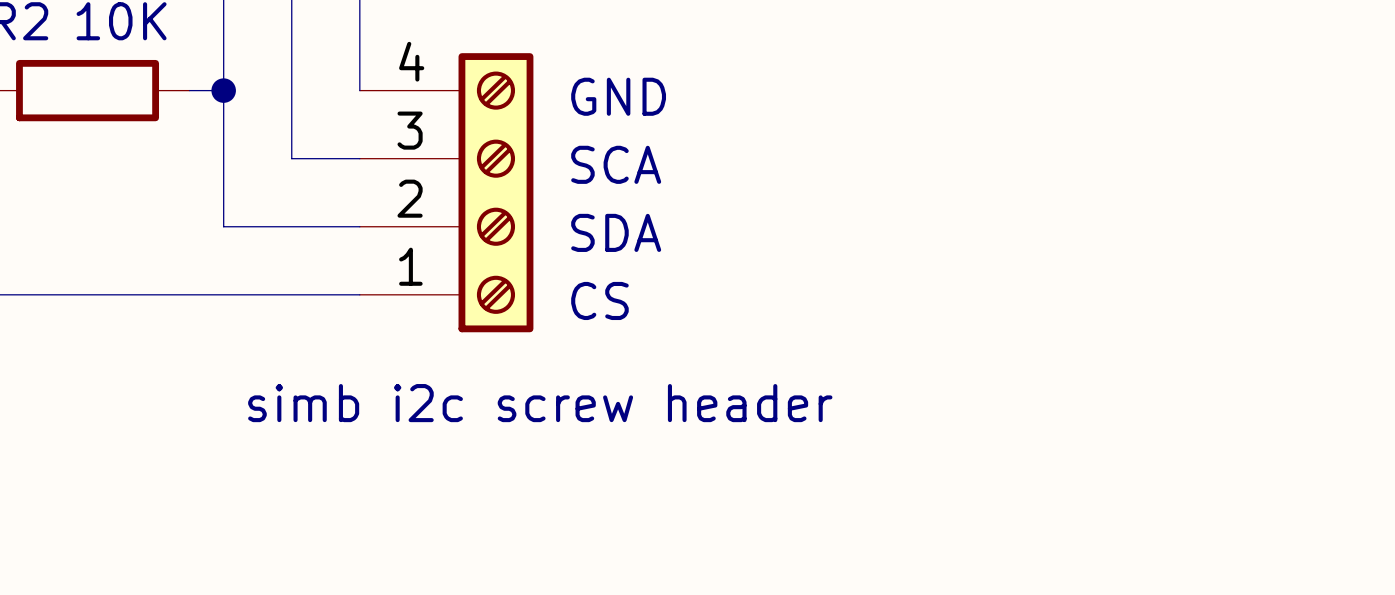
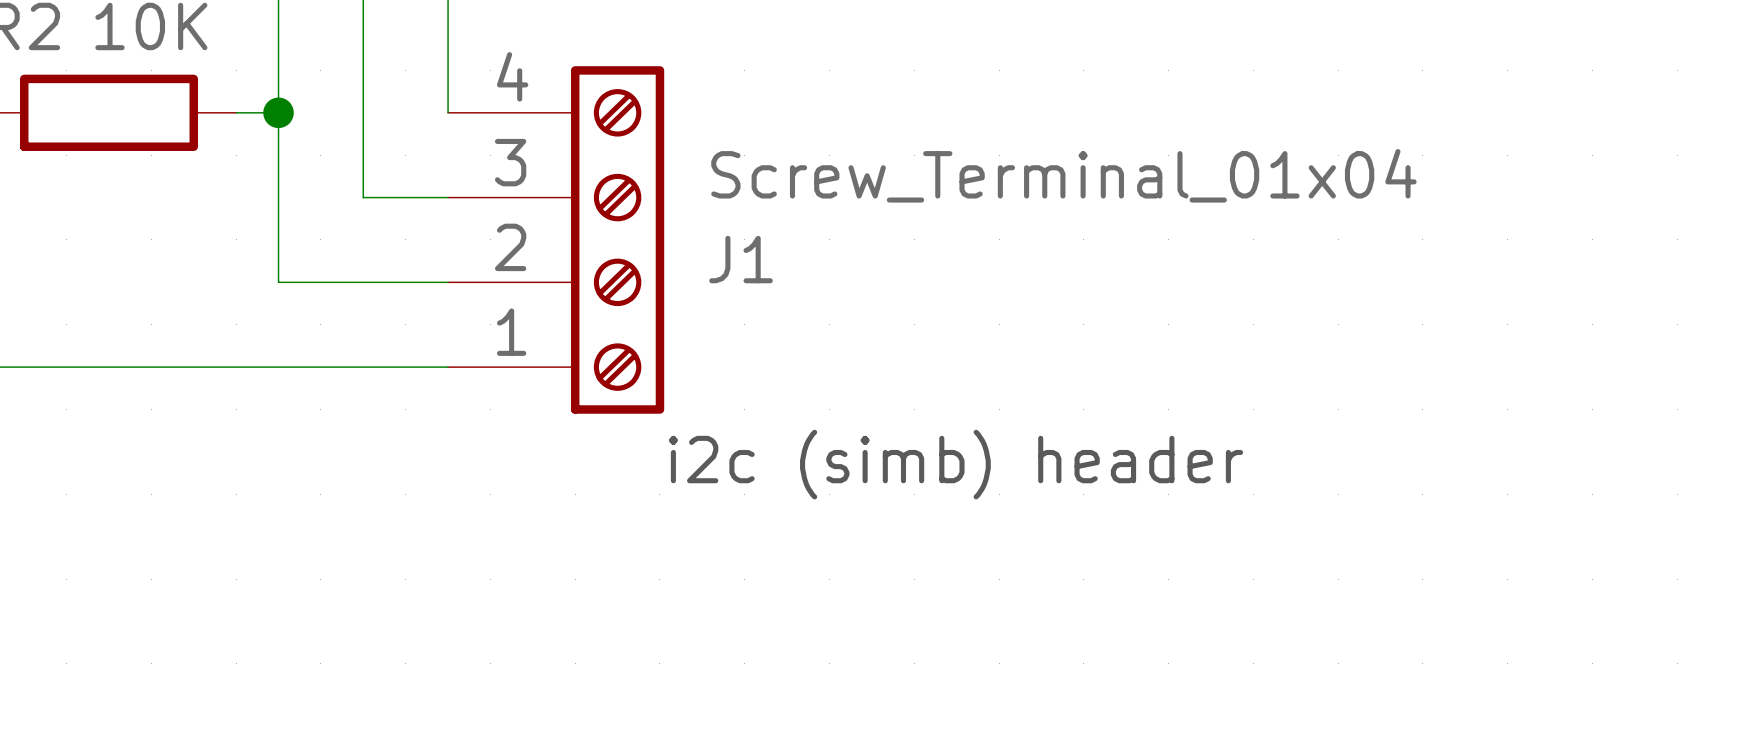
text: GND (618, 96) -> none
J1 value: none -> Screw_Terminal_01x04 (1063, 175)
text: SCA (616, 164) -> none
J1 name: none -> J1 (741, 259)
text: SDA (616, 232) -> none
text: CS (599, 300) -> none
text: none -> i2c (simb) header (955, 464)
text: simb i2c screw header (540, 403) -> none

